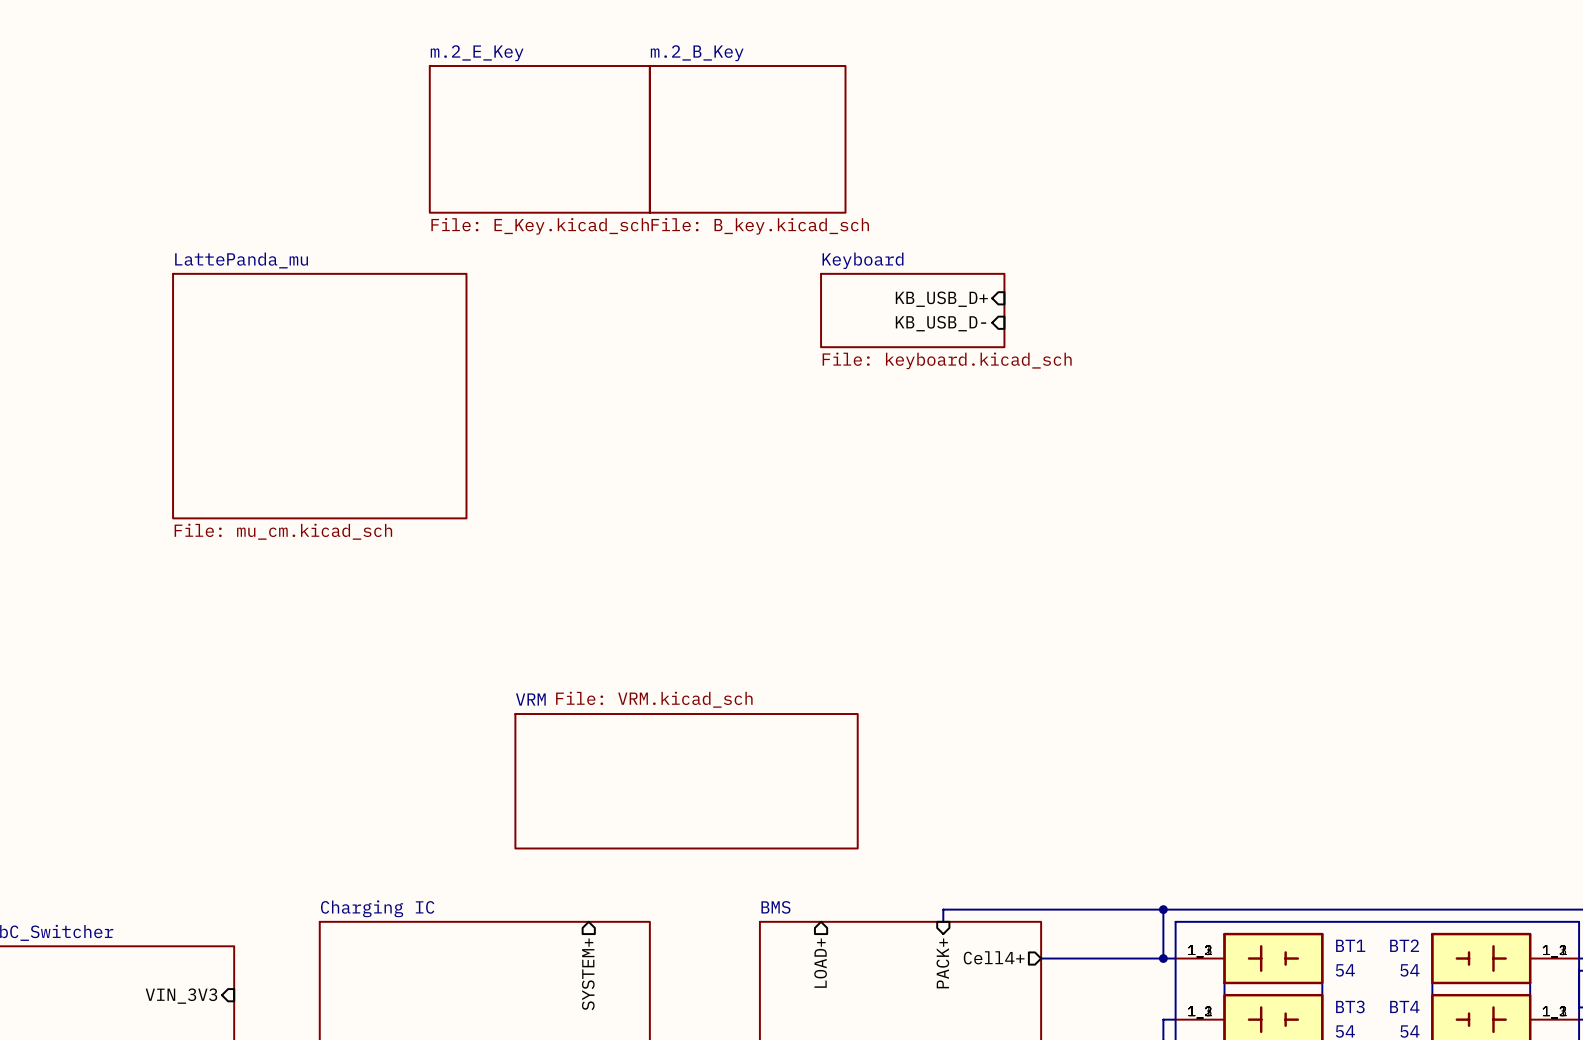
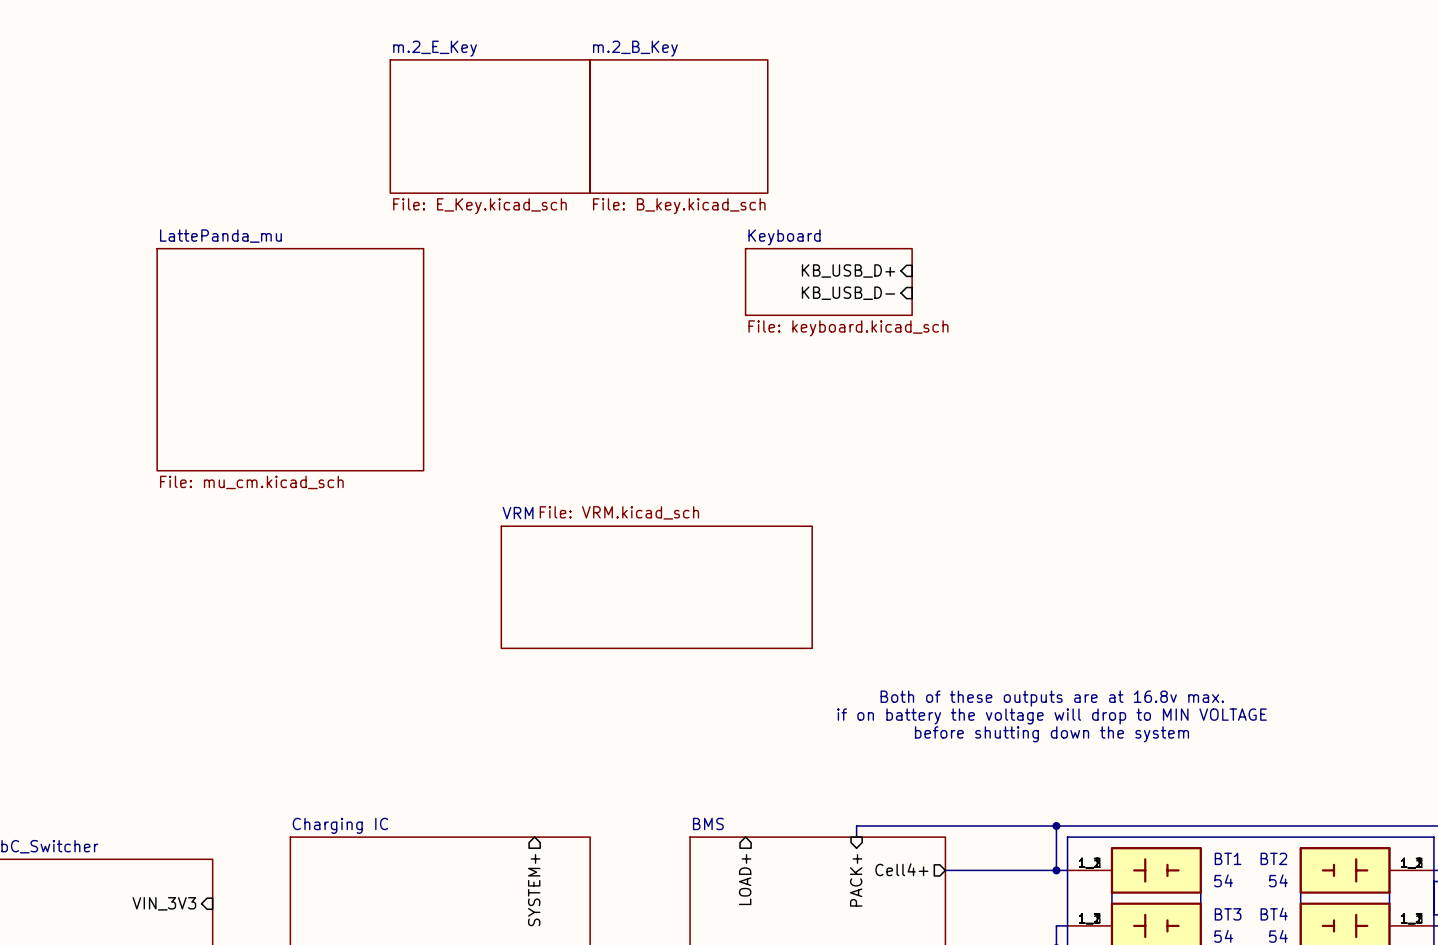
text: none -> Both of these outputs are at 16.8v max. (1052, 698)
sheet VRM position: (686, 781) -> (656, 587)
text: none -> if on battery the voltage will drop to MIN VOLTAGE (1051, 716)
text: none -> before shutting down the system (1051, 734)

